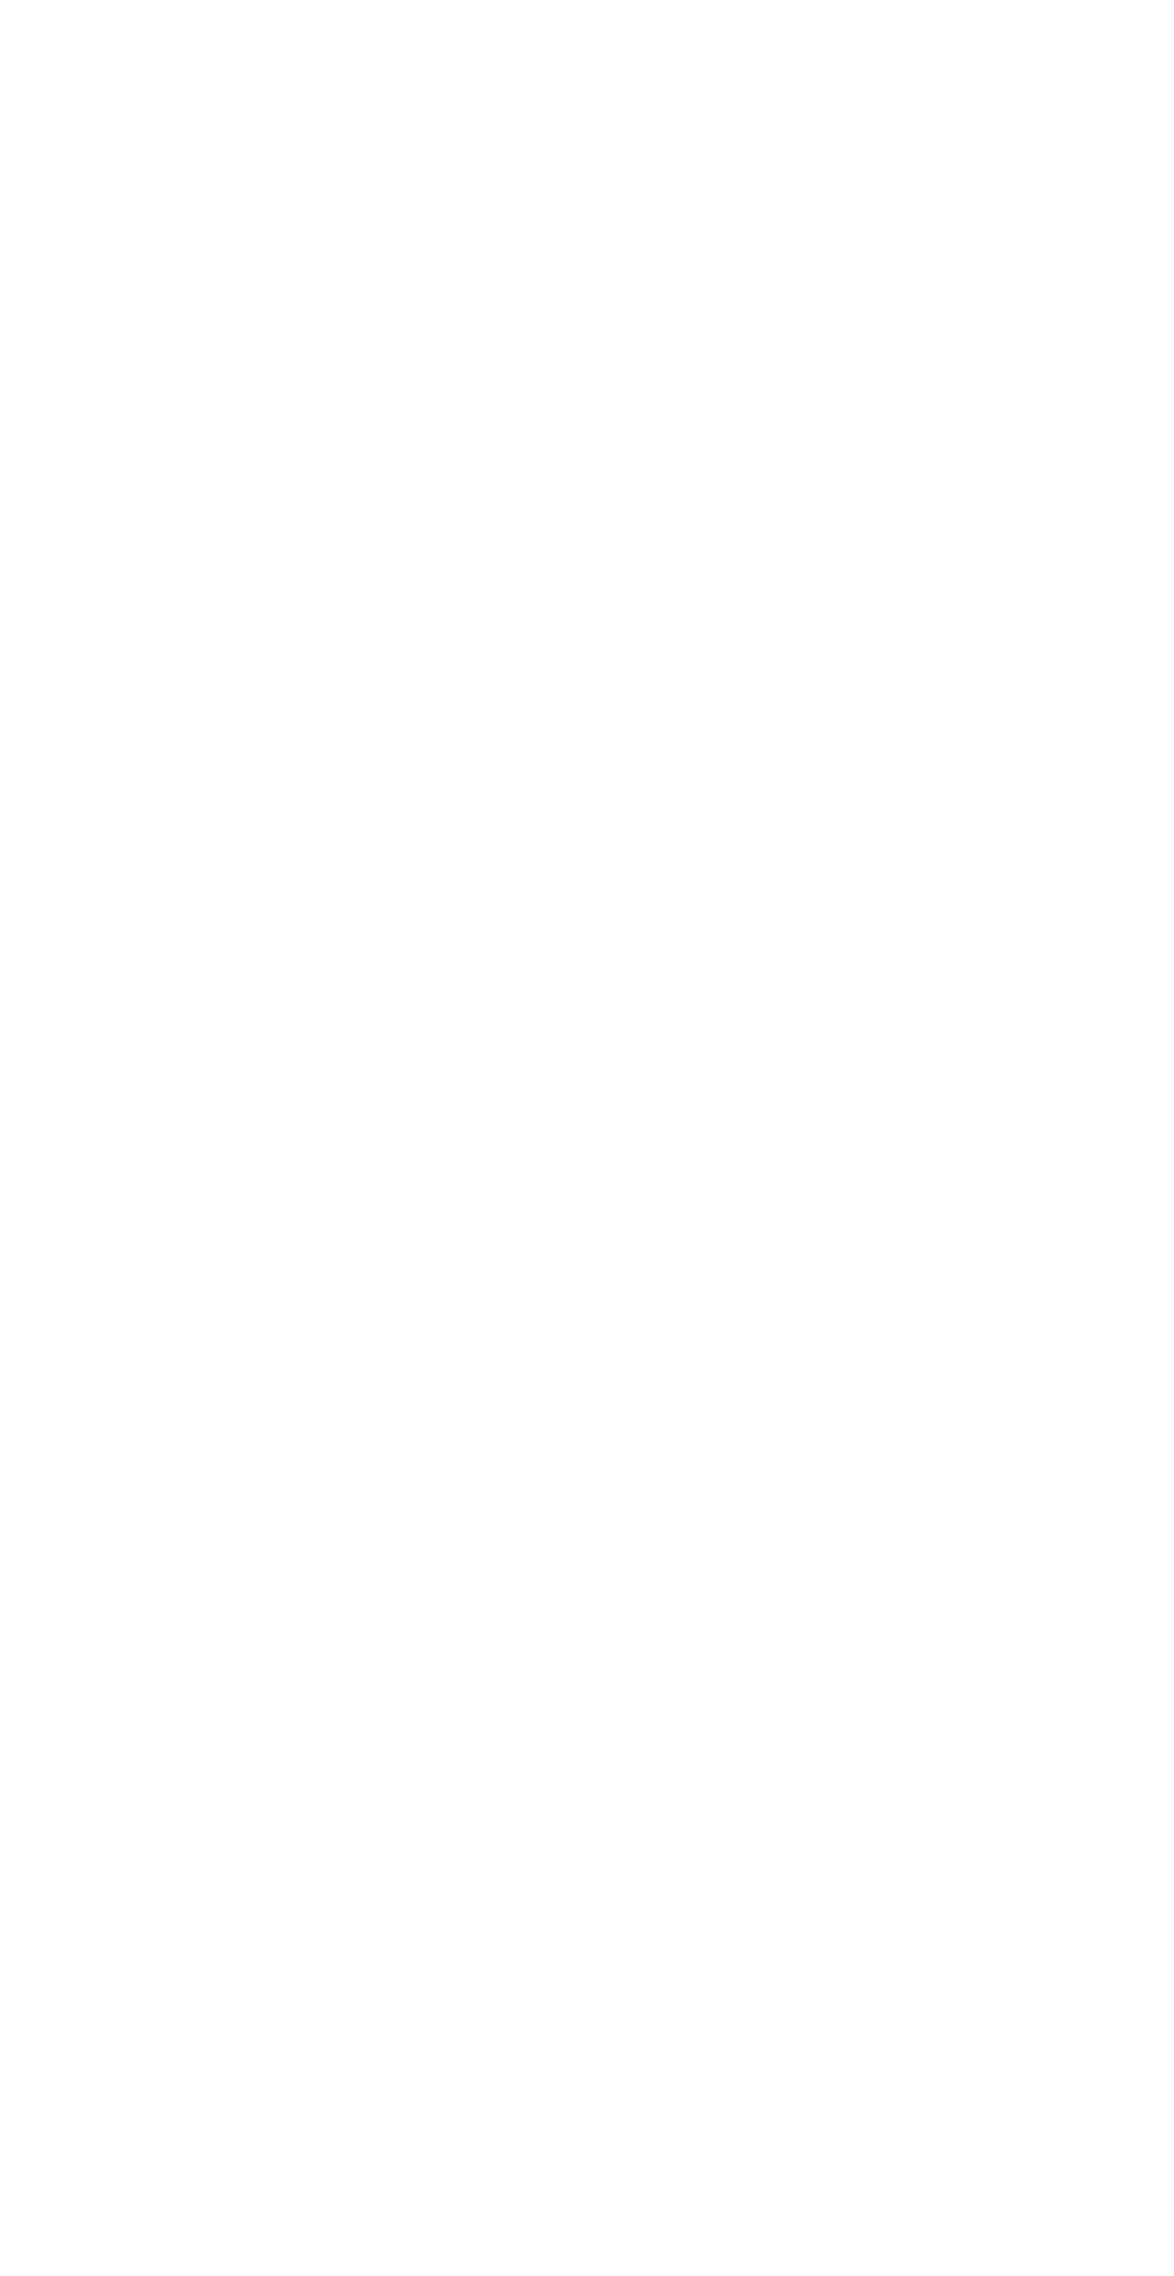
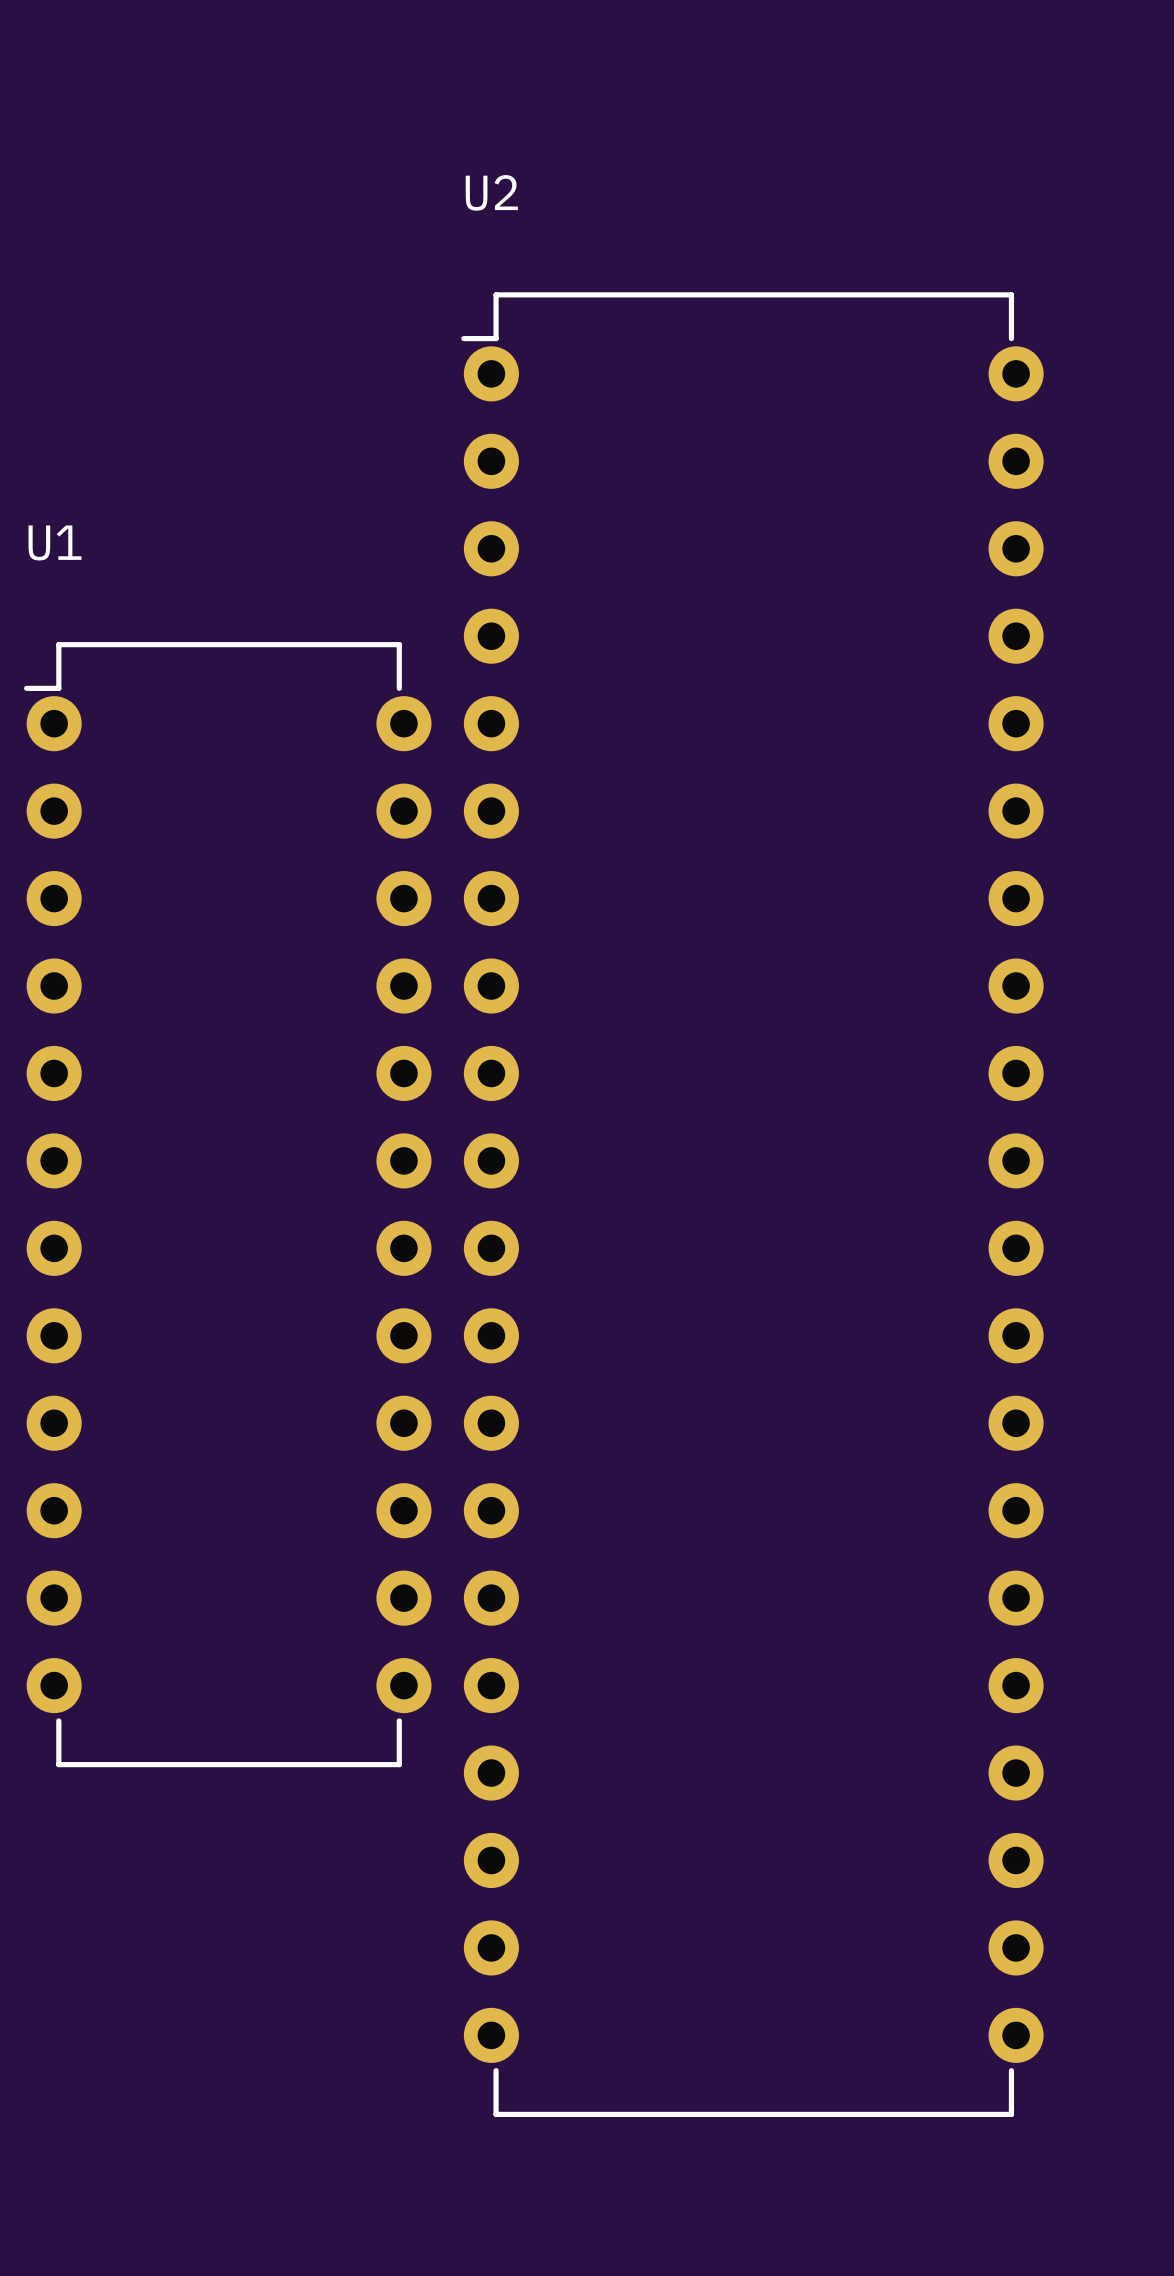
U1: none -> (227, 1204)
U2: none -> (752, 1204)

